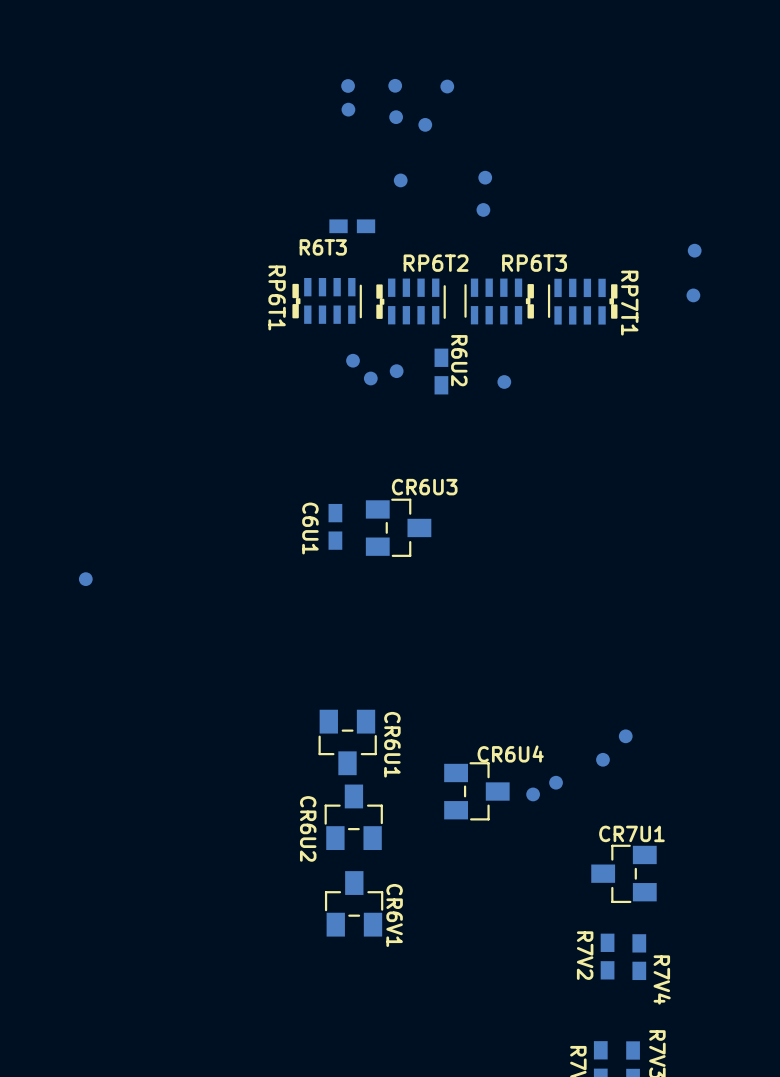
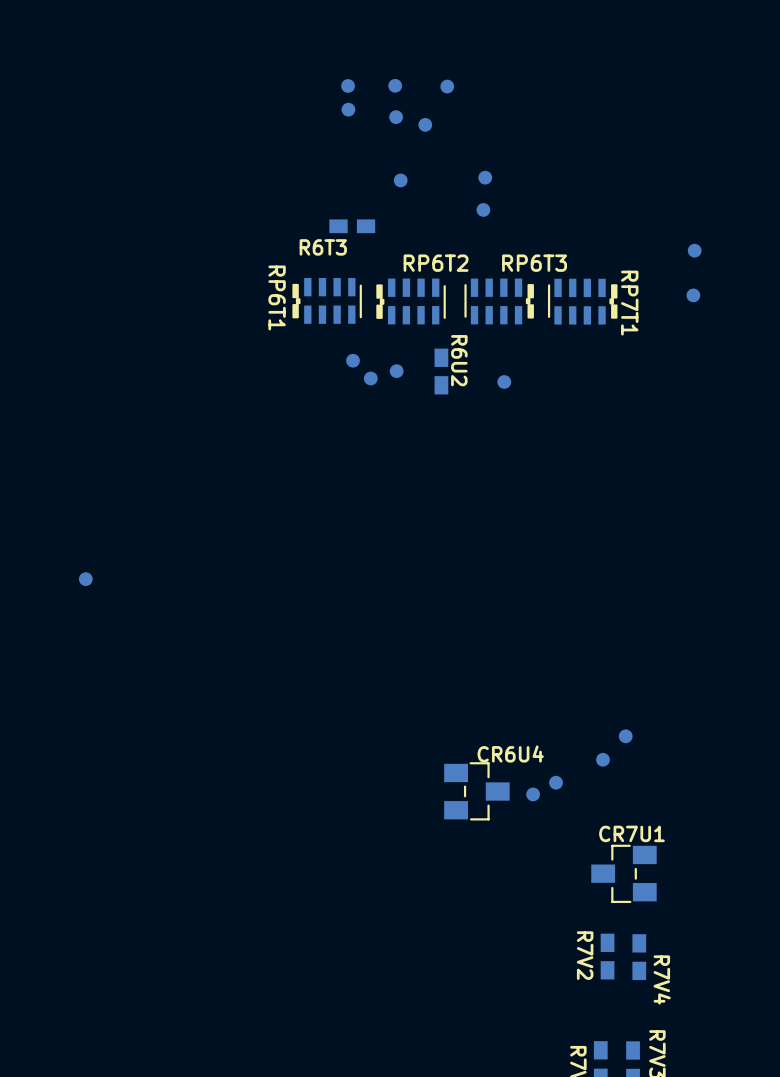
C6U1: (335, 526) -> none
CR6U3: (398, 527) -> none
CR6U1: (347, 742) -> none
CR6U2: (353, 817) -> none
CR6V1: (354, 903) -> none

